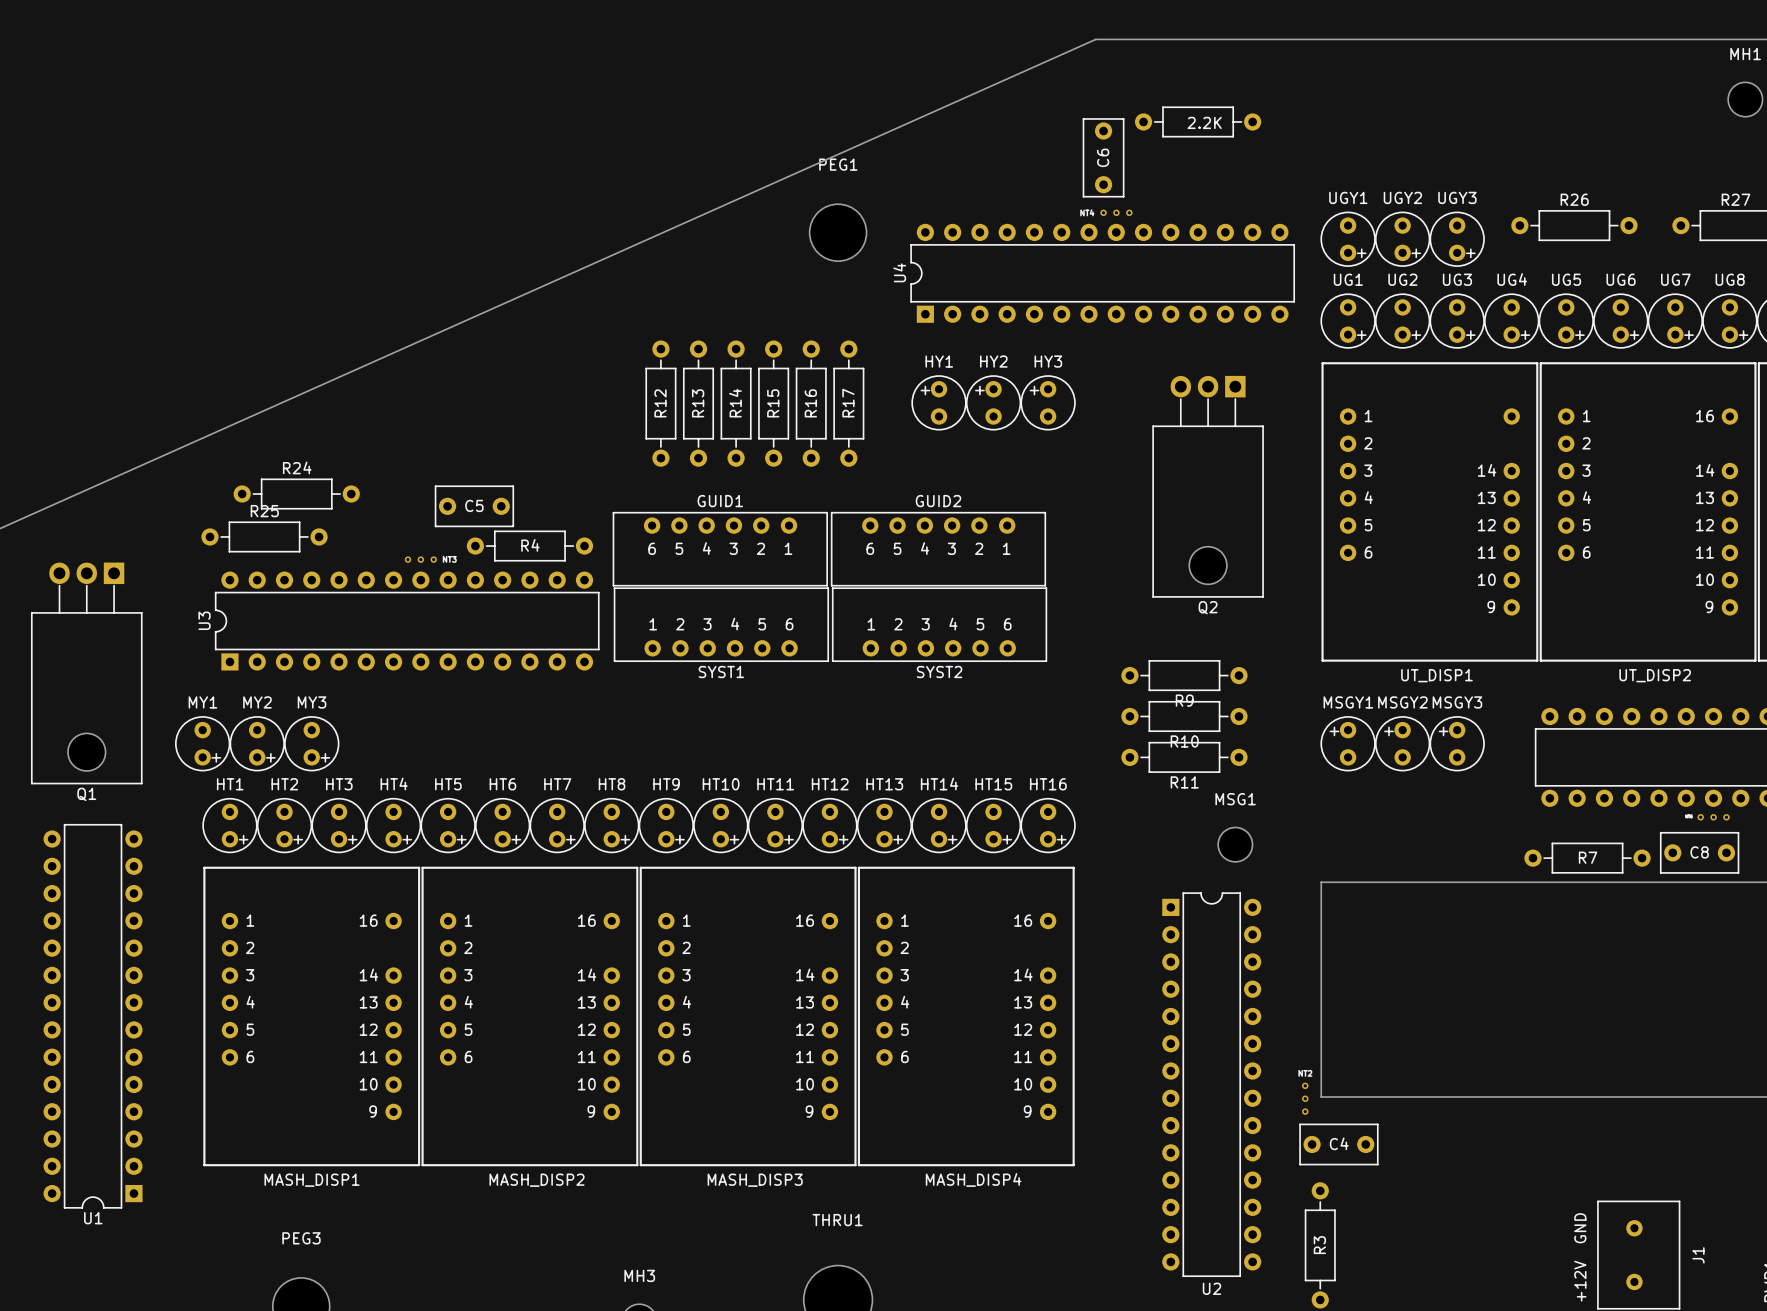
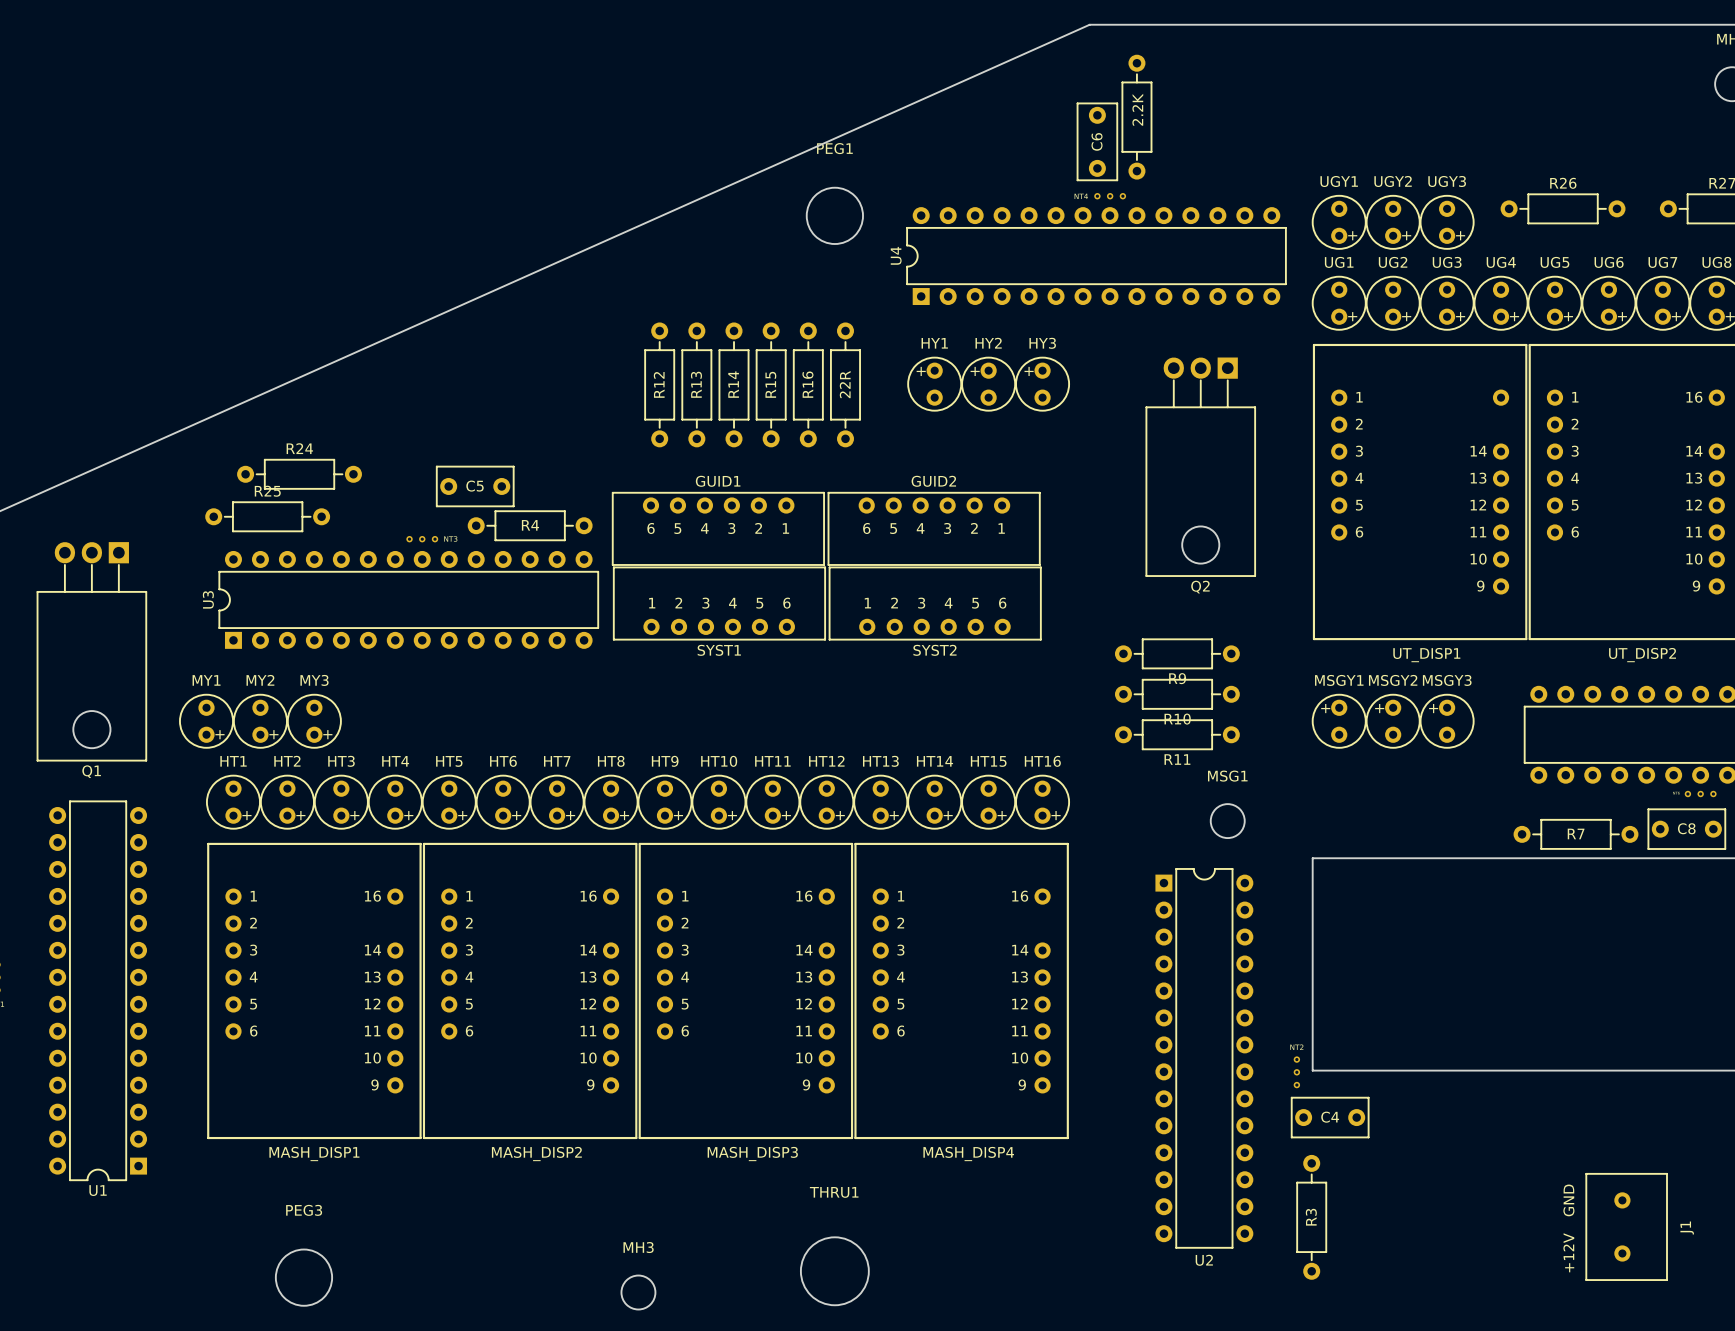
part rotation: 0° (1198, 121) -> 90° clockwise (1136, 117)
R17 name: R17 (848, 403) -> none
R17 value: none -> 22R (845, 384)

